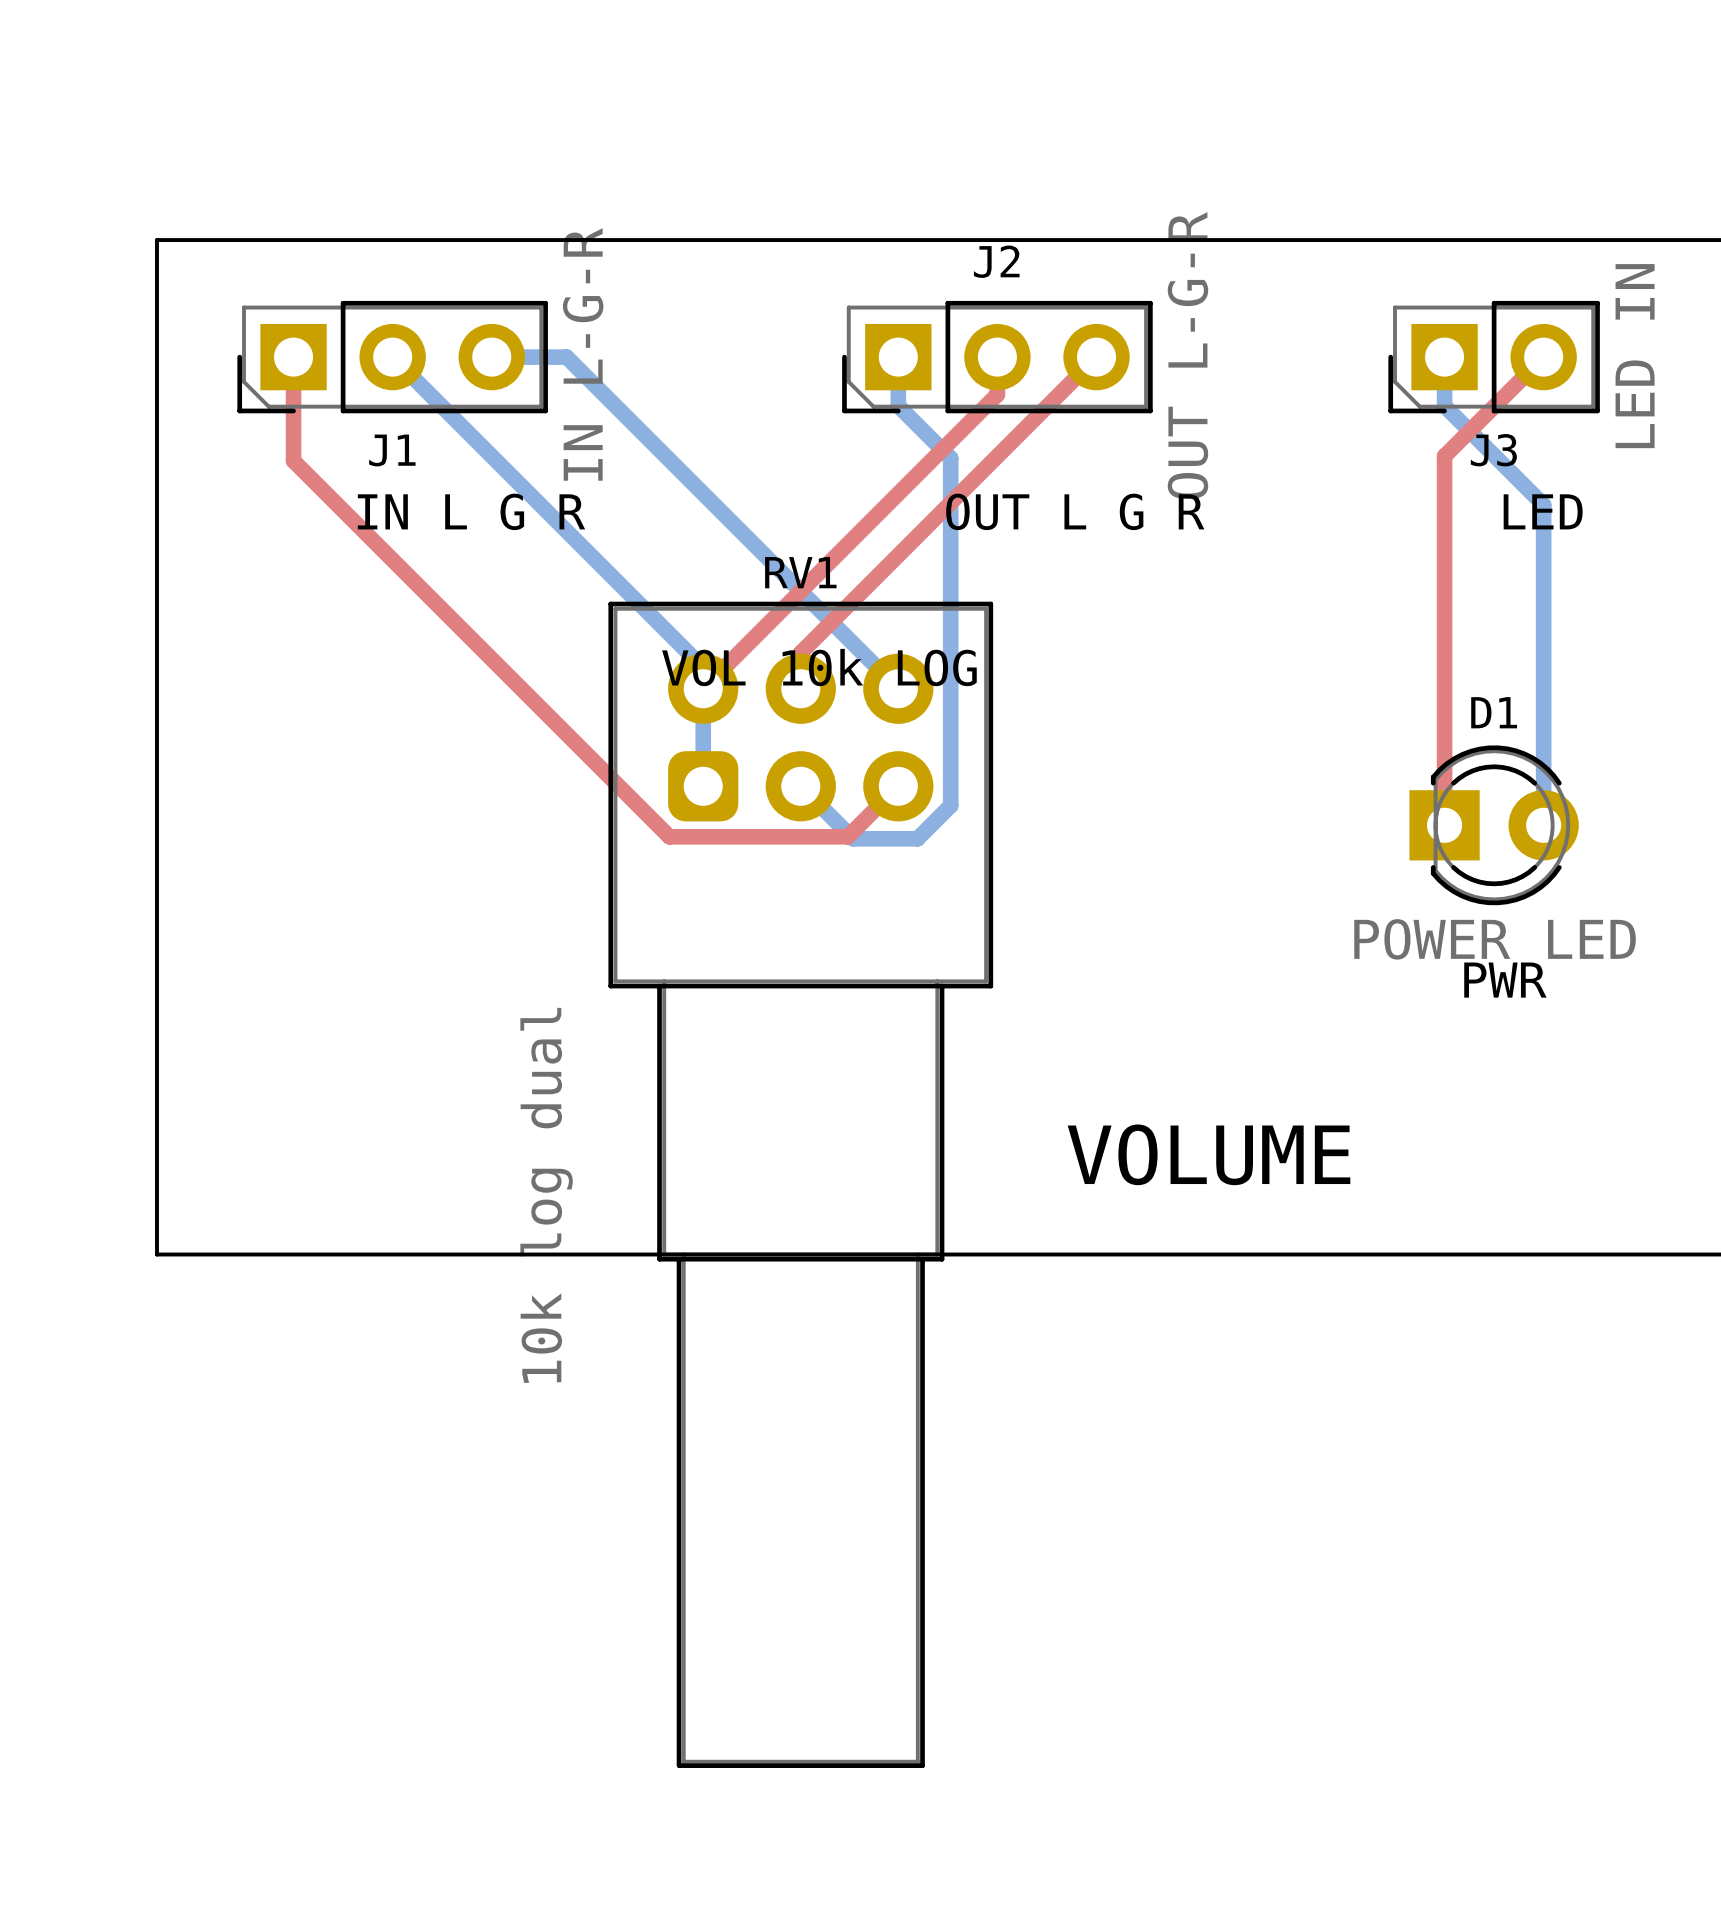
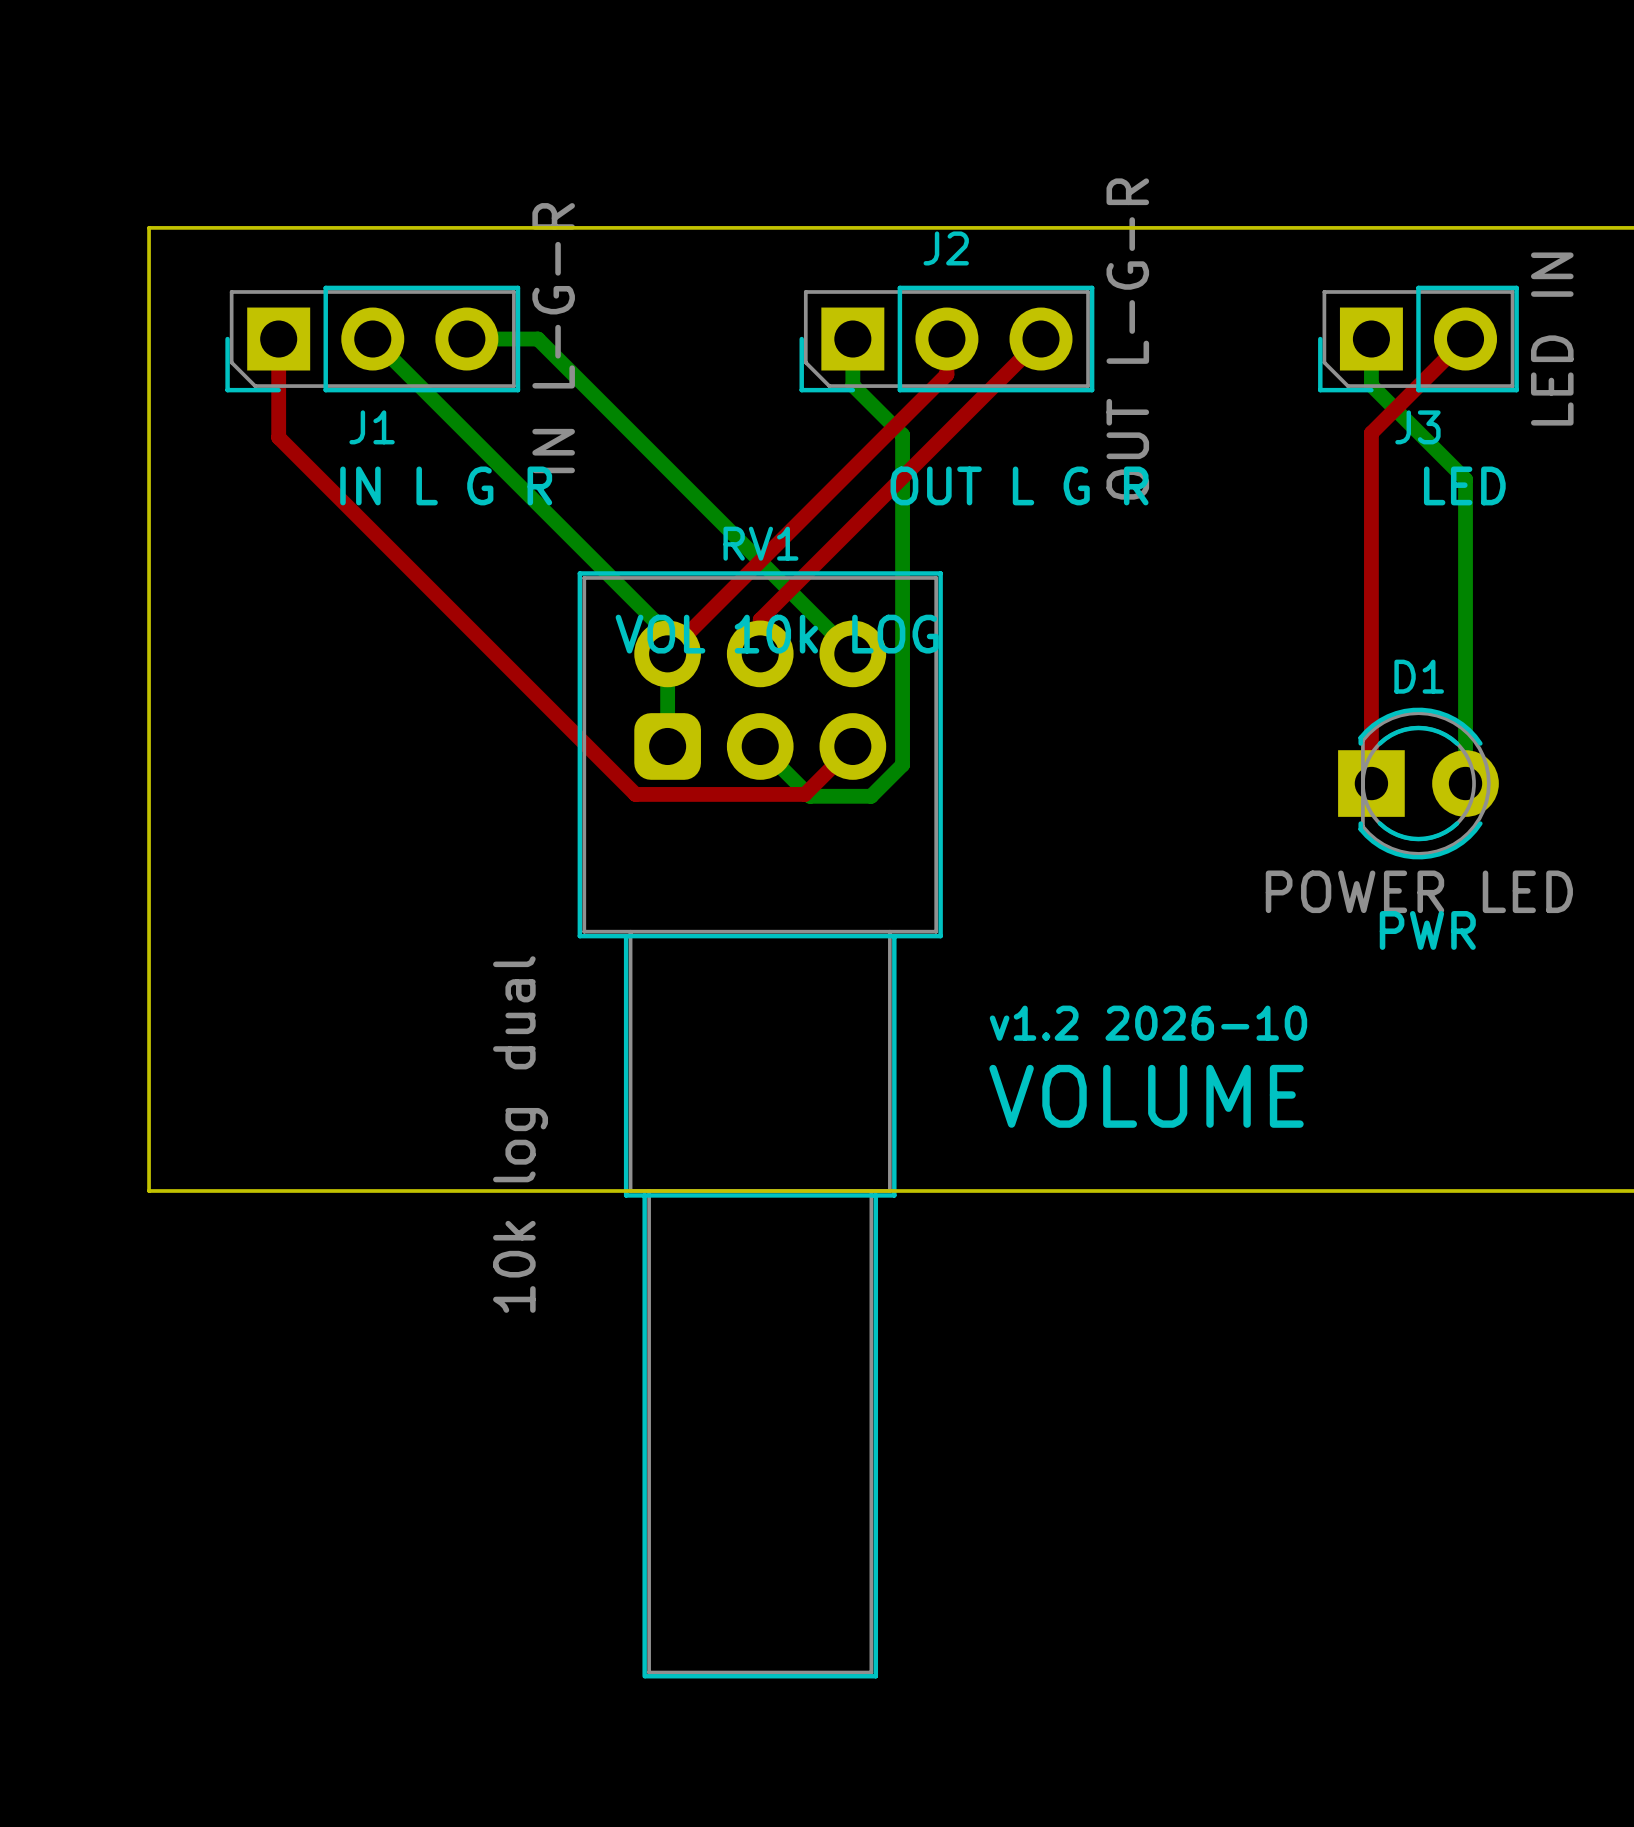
text: none -> v1.2 2026-10 (1148, 1023)

